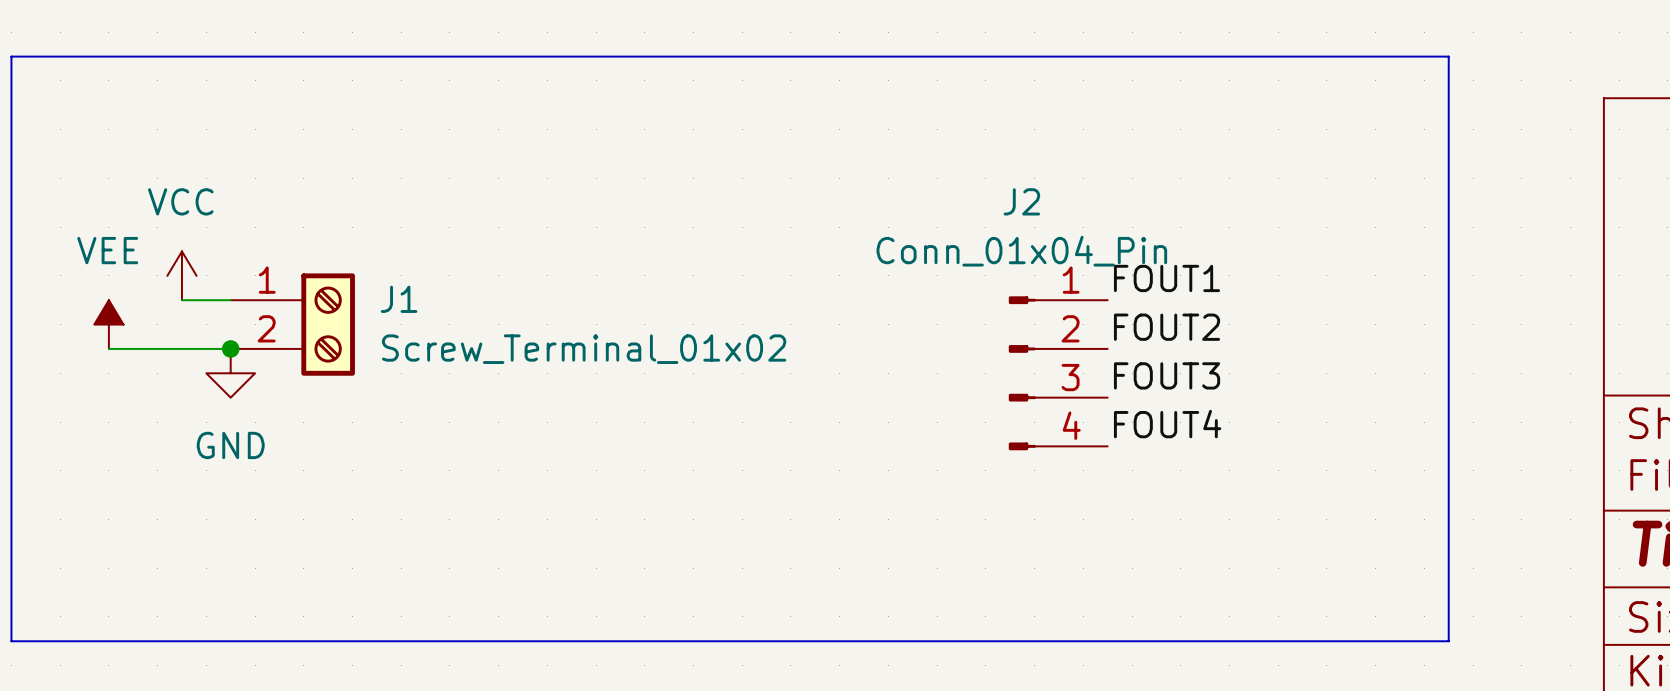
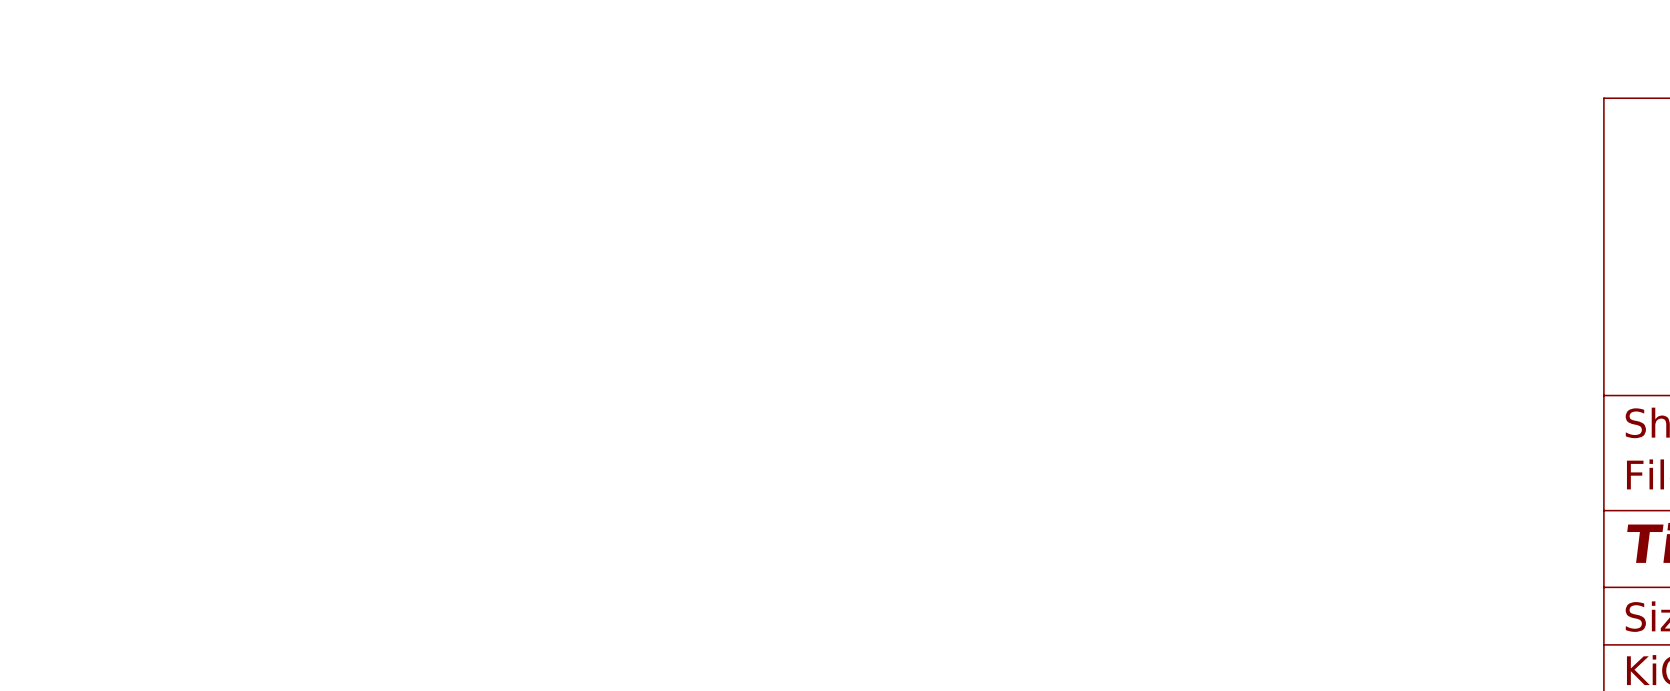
line: (11, 56) (11, 641) (1448, 641) (1448, 56) (11, 56) -> none
power symbol: VCC (181, 275) -> none
label: FOUT1 (1167, 278) -> none
wire: (181, 300) (230, 300) -> none
power symbol: VEE (108, 324) -> none
J1: Screw_Terminal_01x02 (292, 324) -> none
label: FOUT2 (1167, 327) -> none
wire: (108, 348) (230, 348) -> none
junction: (230, 348) -> none
power symbol: GND (230, 373) -> none
J2: Conn_01x04_Pin (1058, 373) -> none
label: FOUT3 (1167, 375) -> none
label: FOUT4 (1167, 424) -> none

